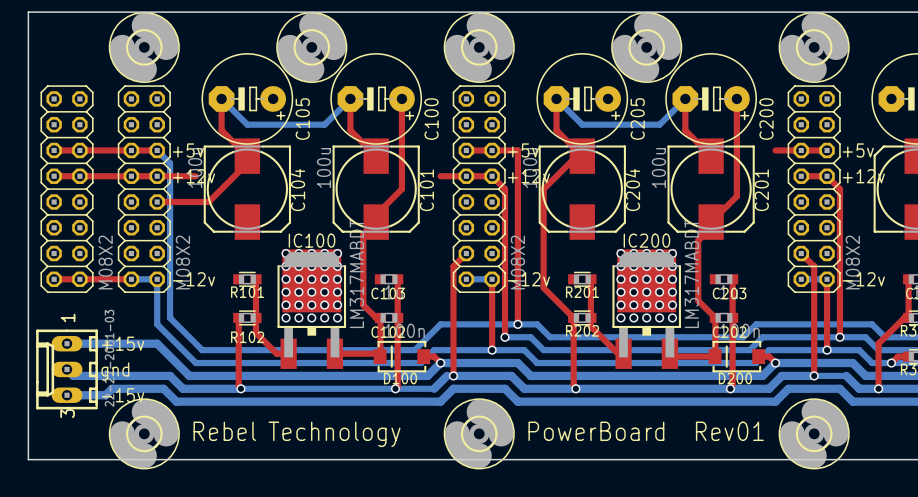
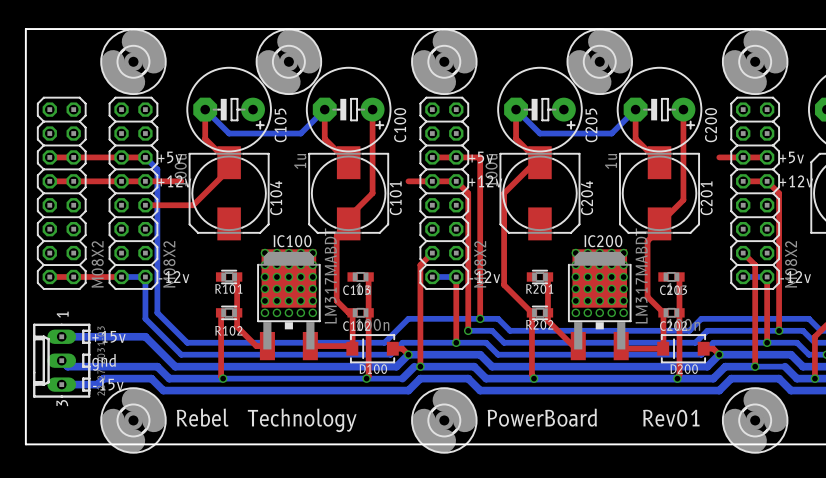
C101 value: 100u (323, 168) -> 1u (300, 161)
C201 value: 100u (658, 168) -> 1u (611, 161)

